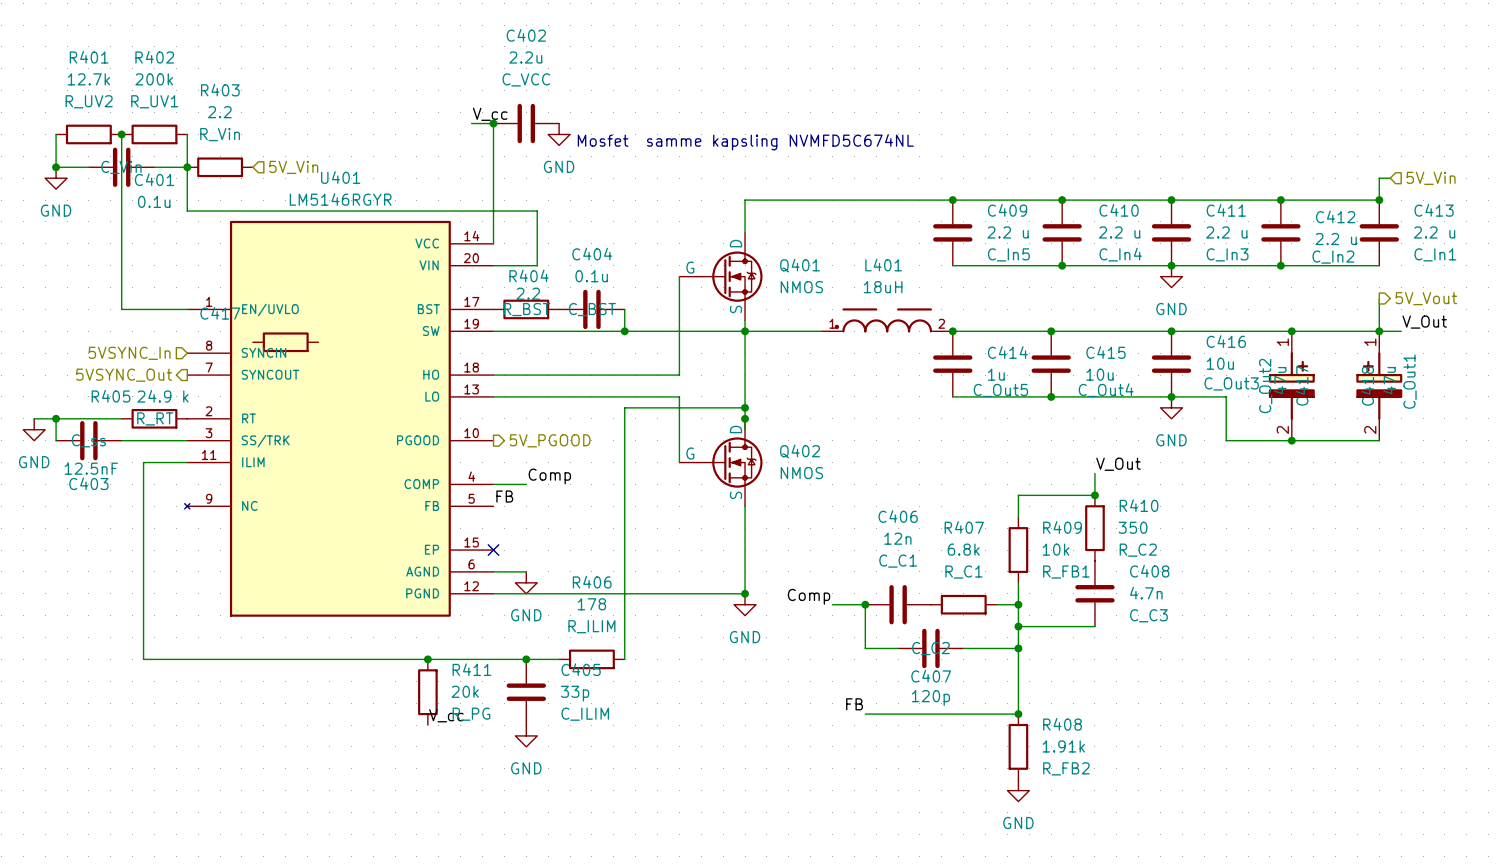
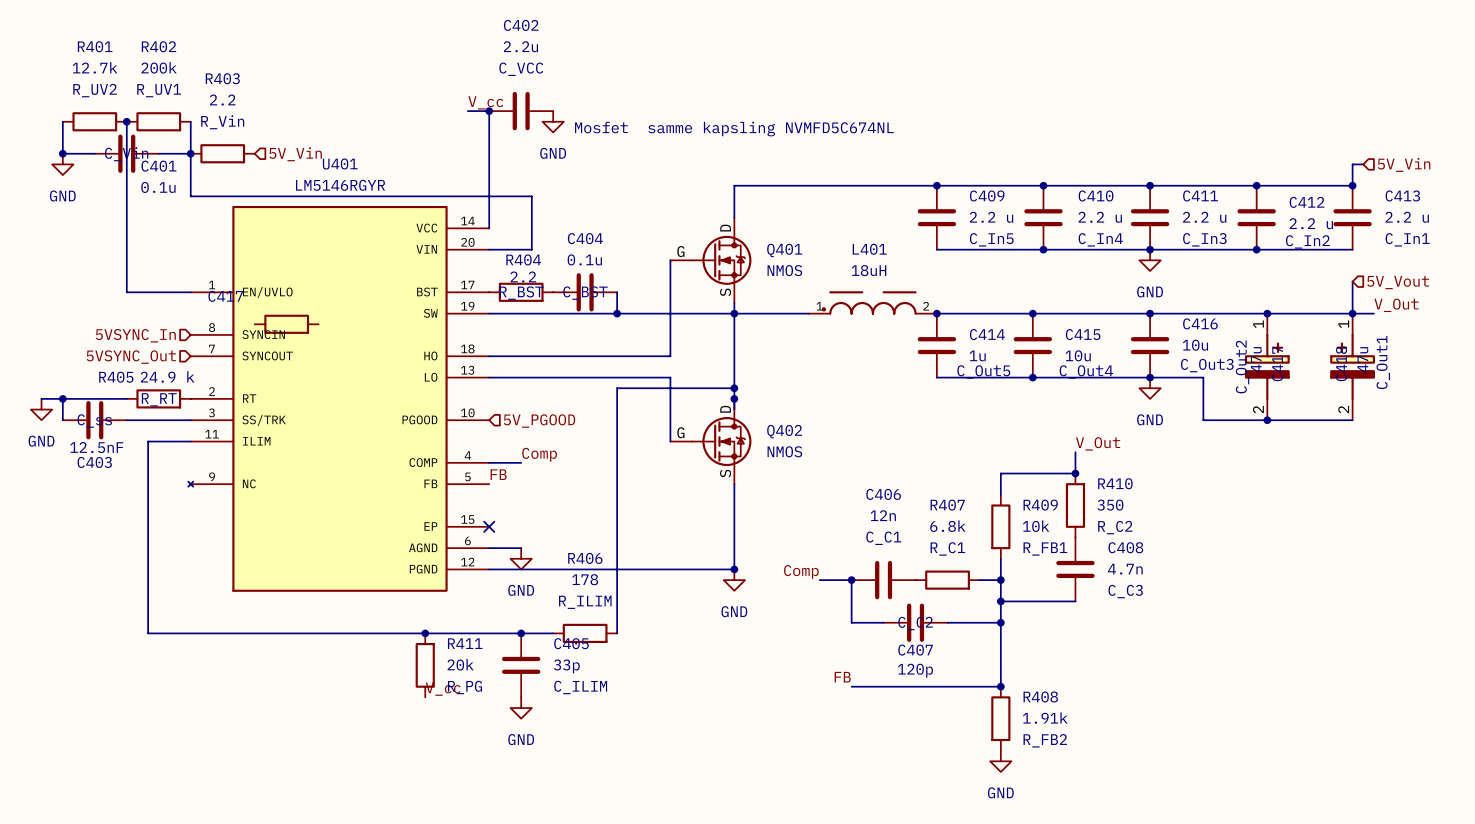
hierarchical label shape: output (1426, 298) -> input (1398, 282)
hierarchical label shape: output (124, 375) -> input (131, 357)
hierarchical label shape: output (550, 440) -> input (539, 421)

